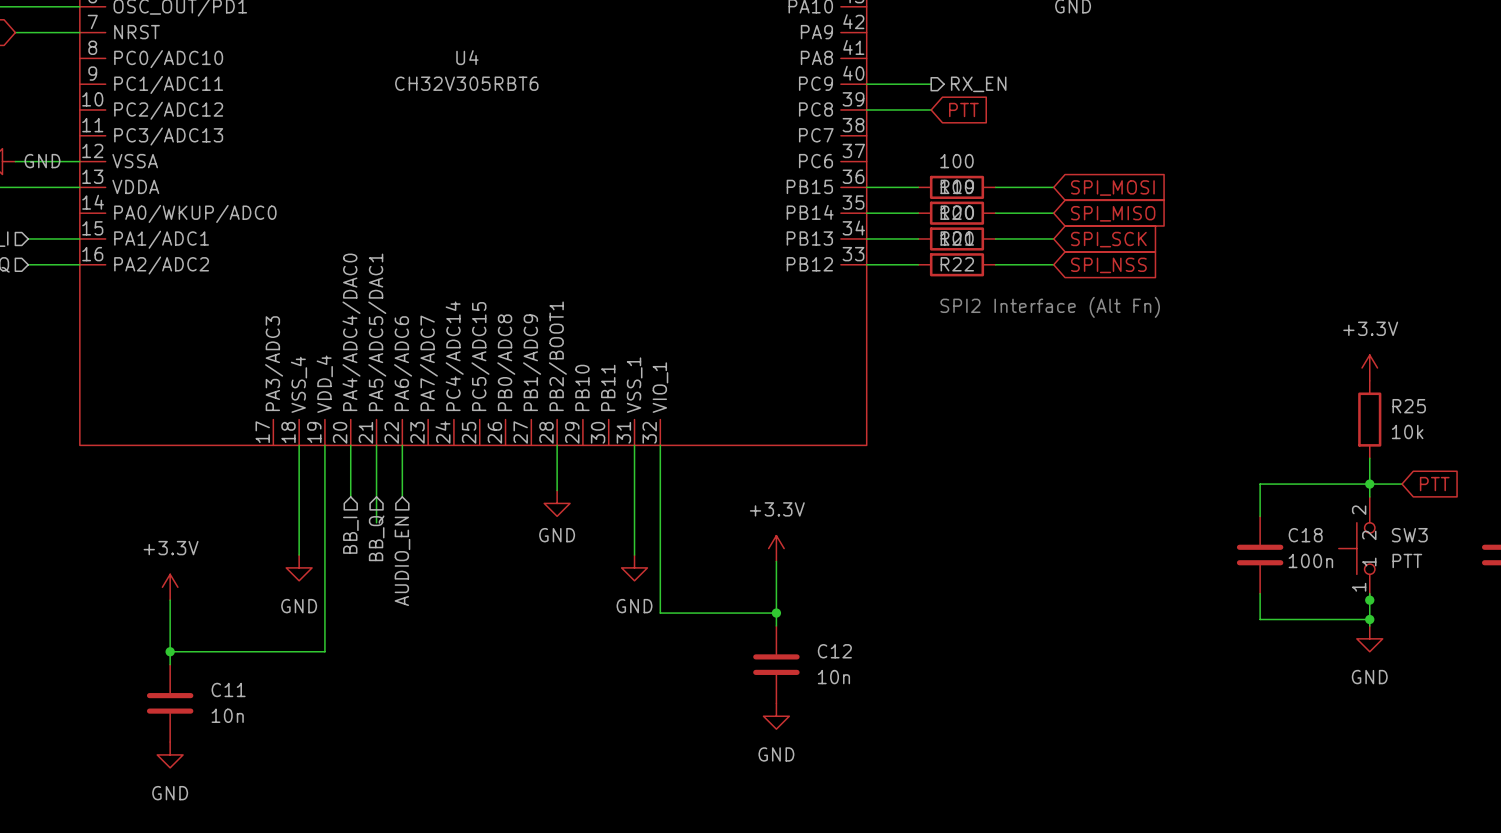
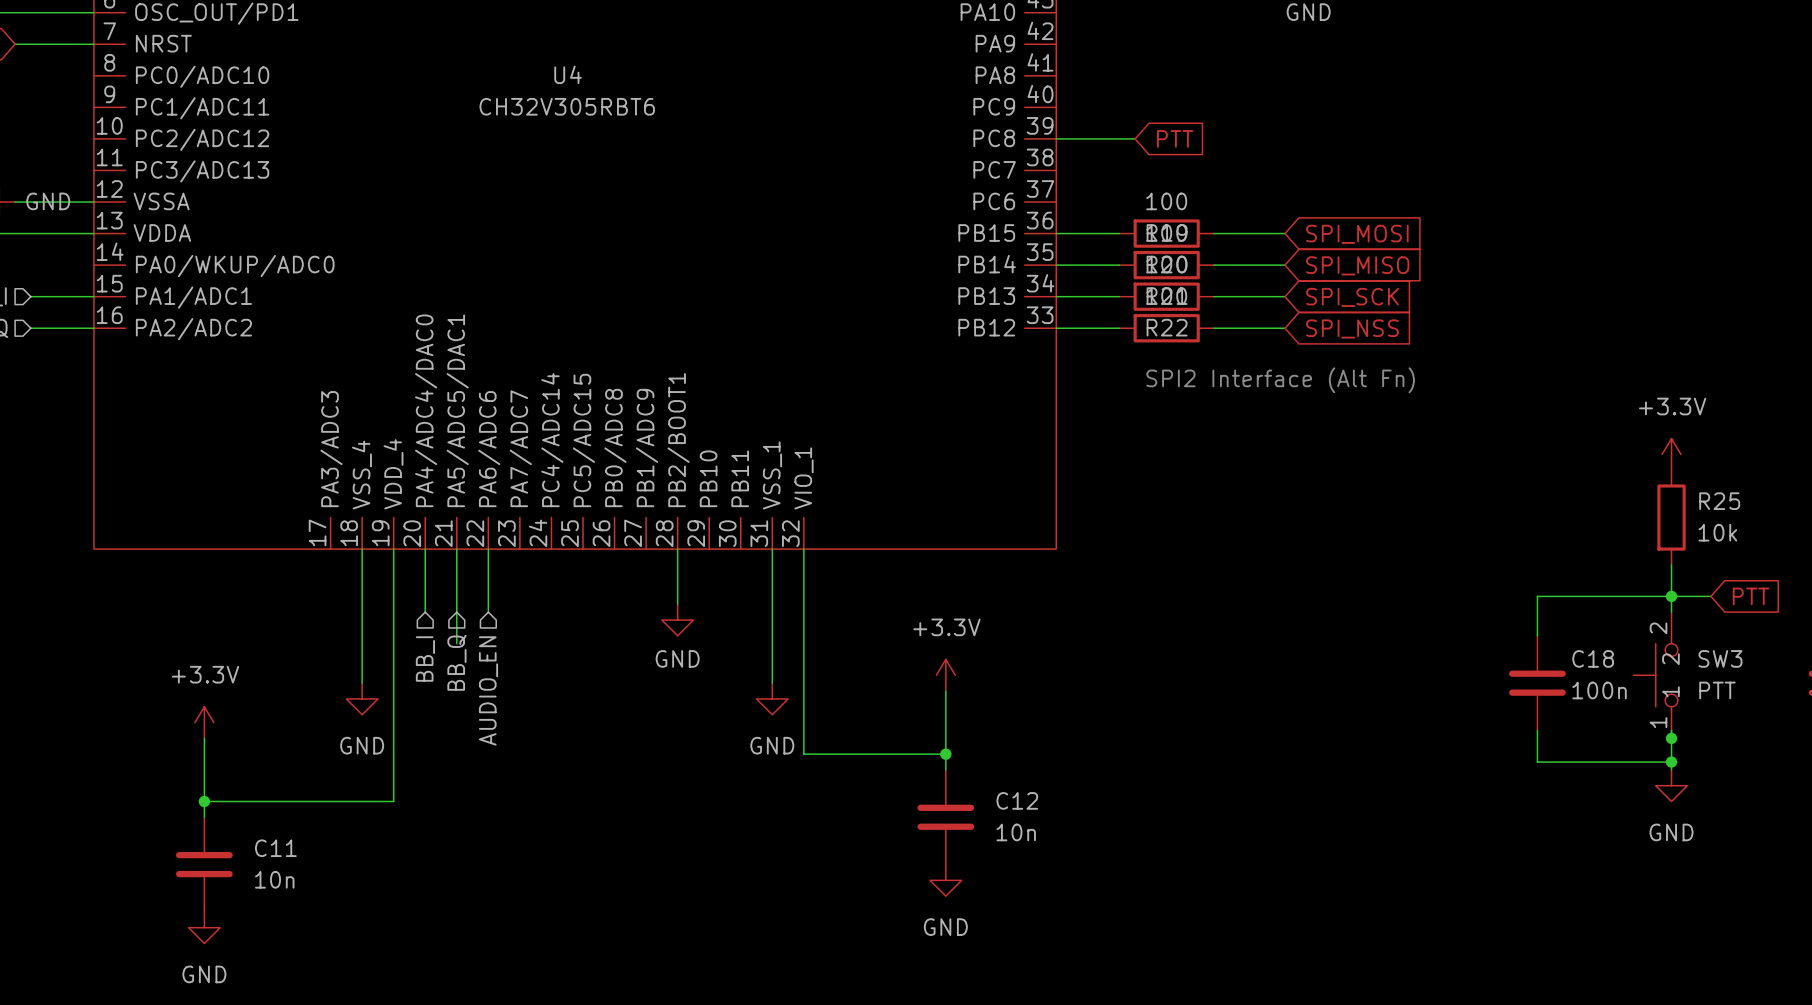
wire: (866, 84) (931, 84) -> none
hierarchical label: RX_EN (978, 84) -> none

